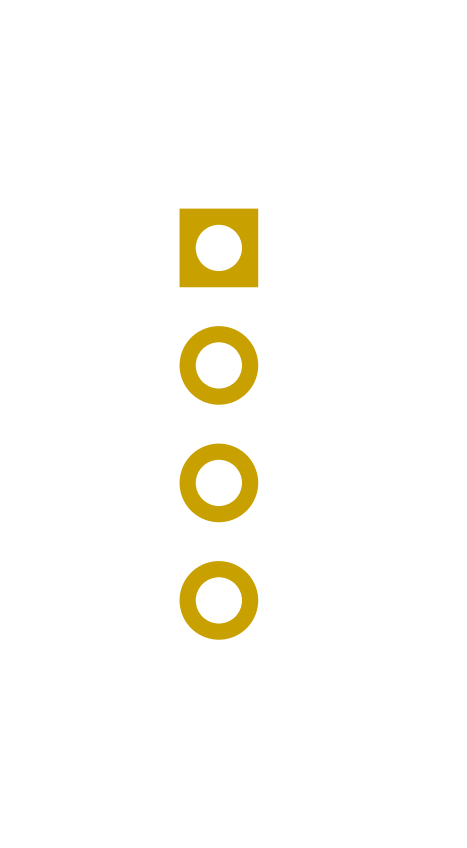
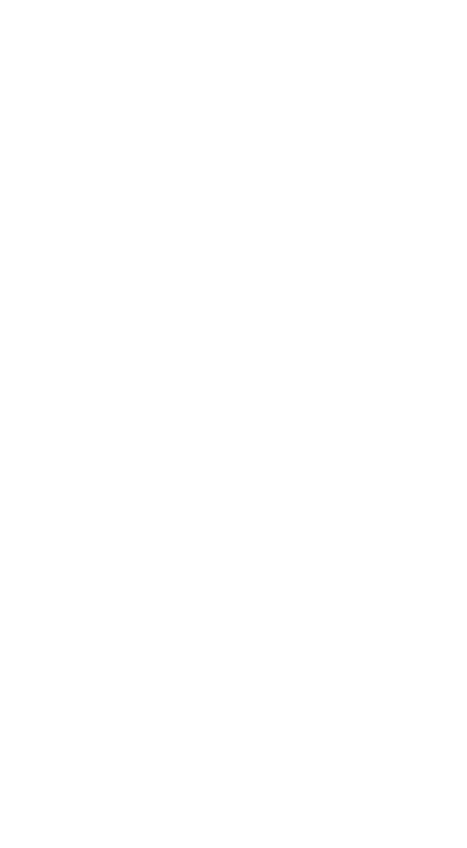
part: (218, 424) -> none

